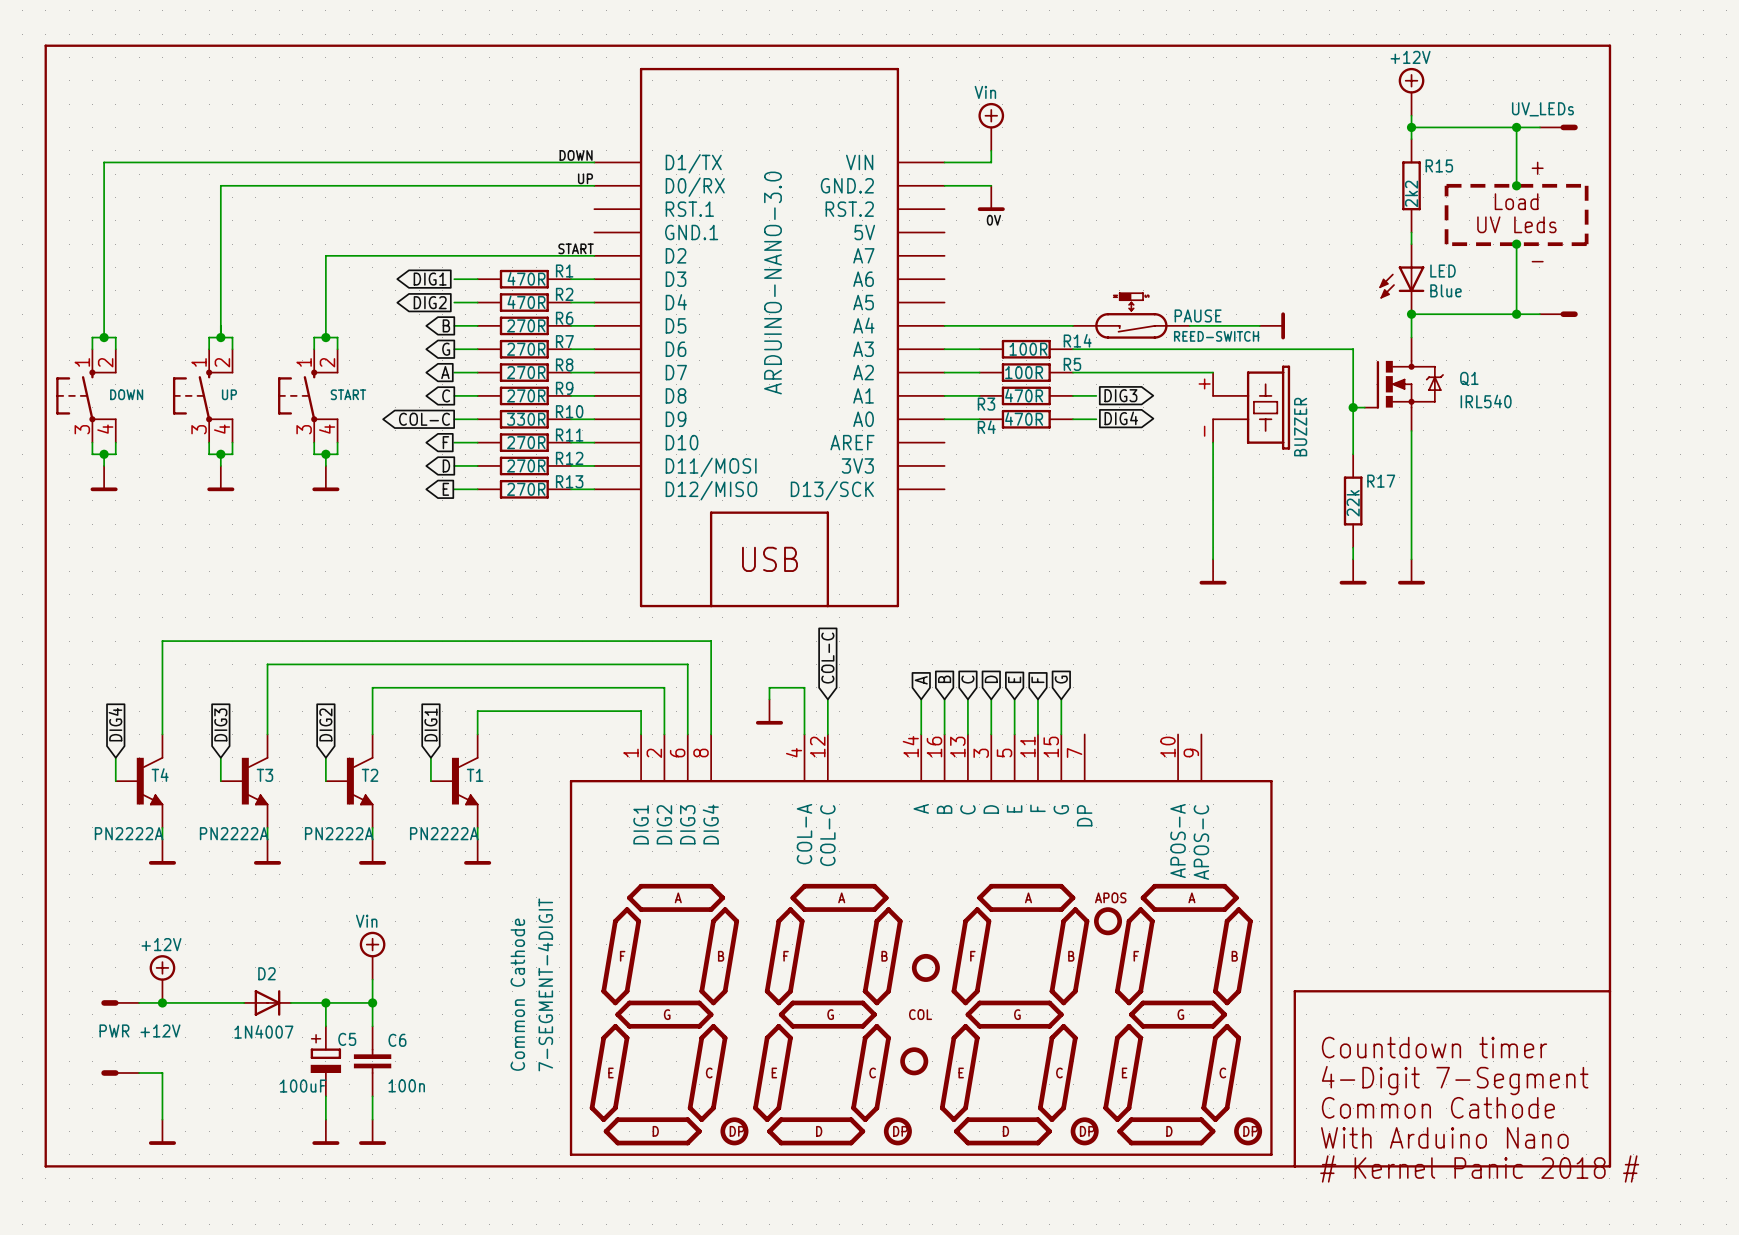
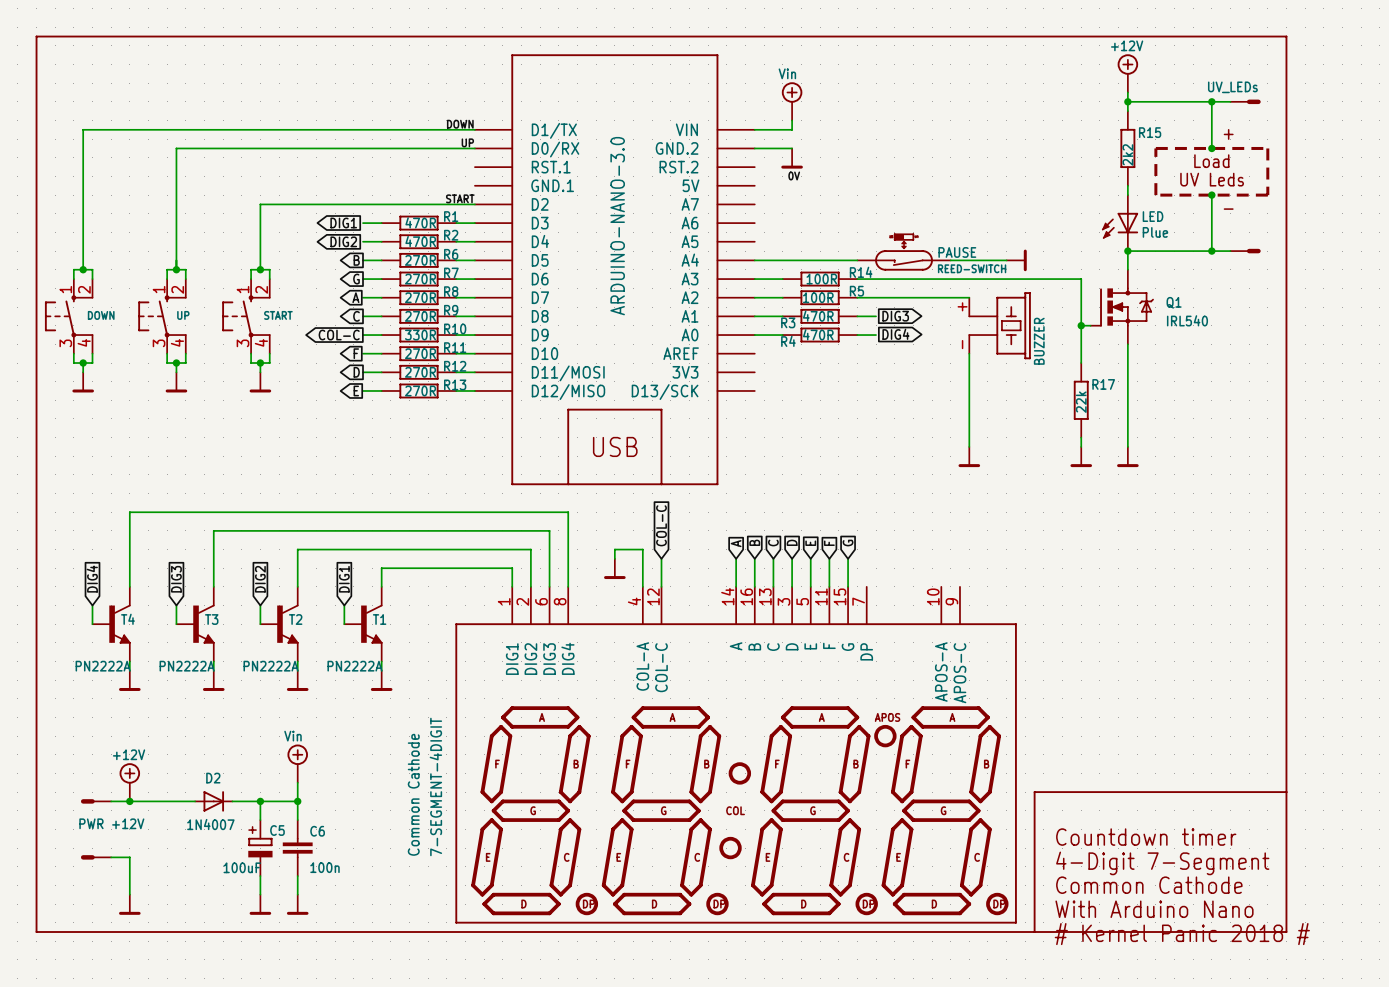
LED value: Blue (1446, 290) -> Plue (1155, 232)

